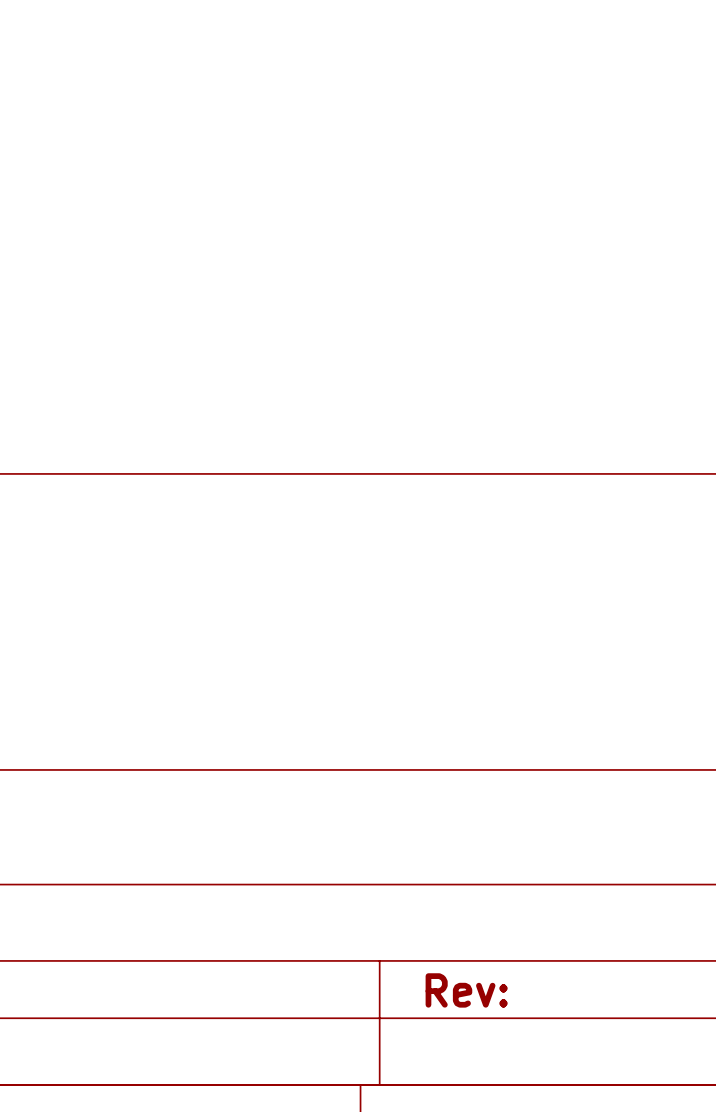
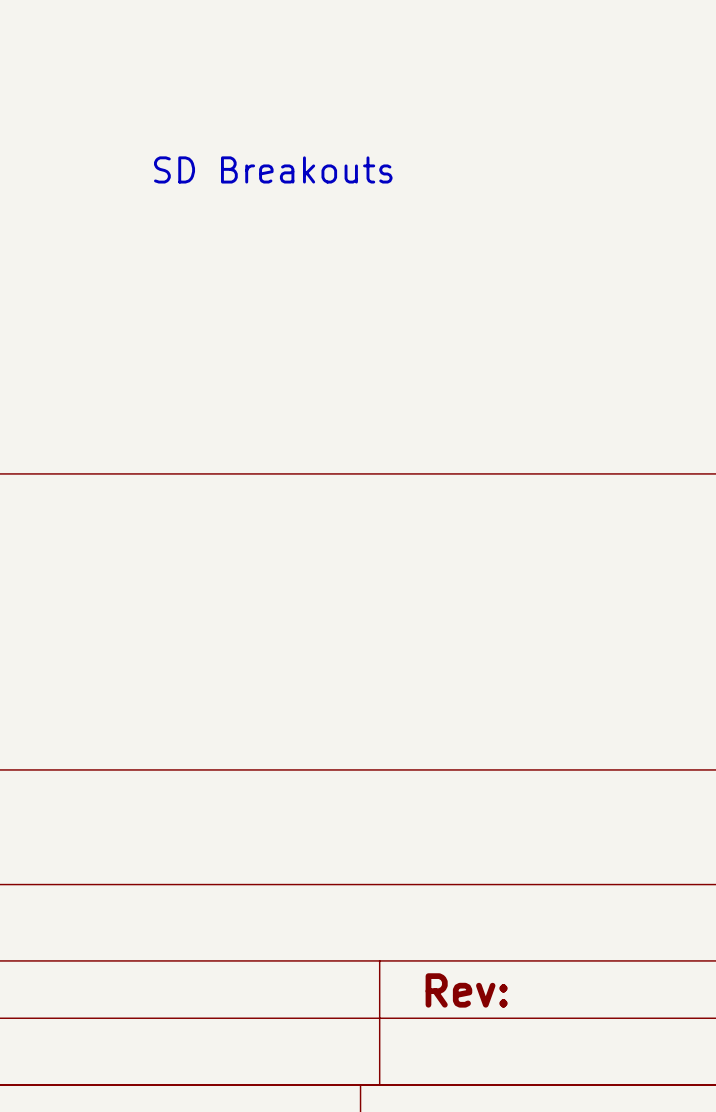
text: none -> SD Breakouts (273, 169)

